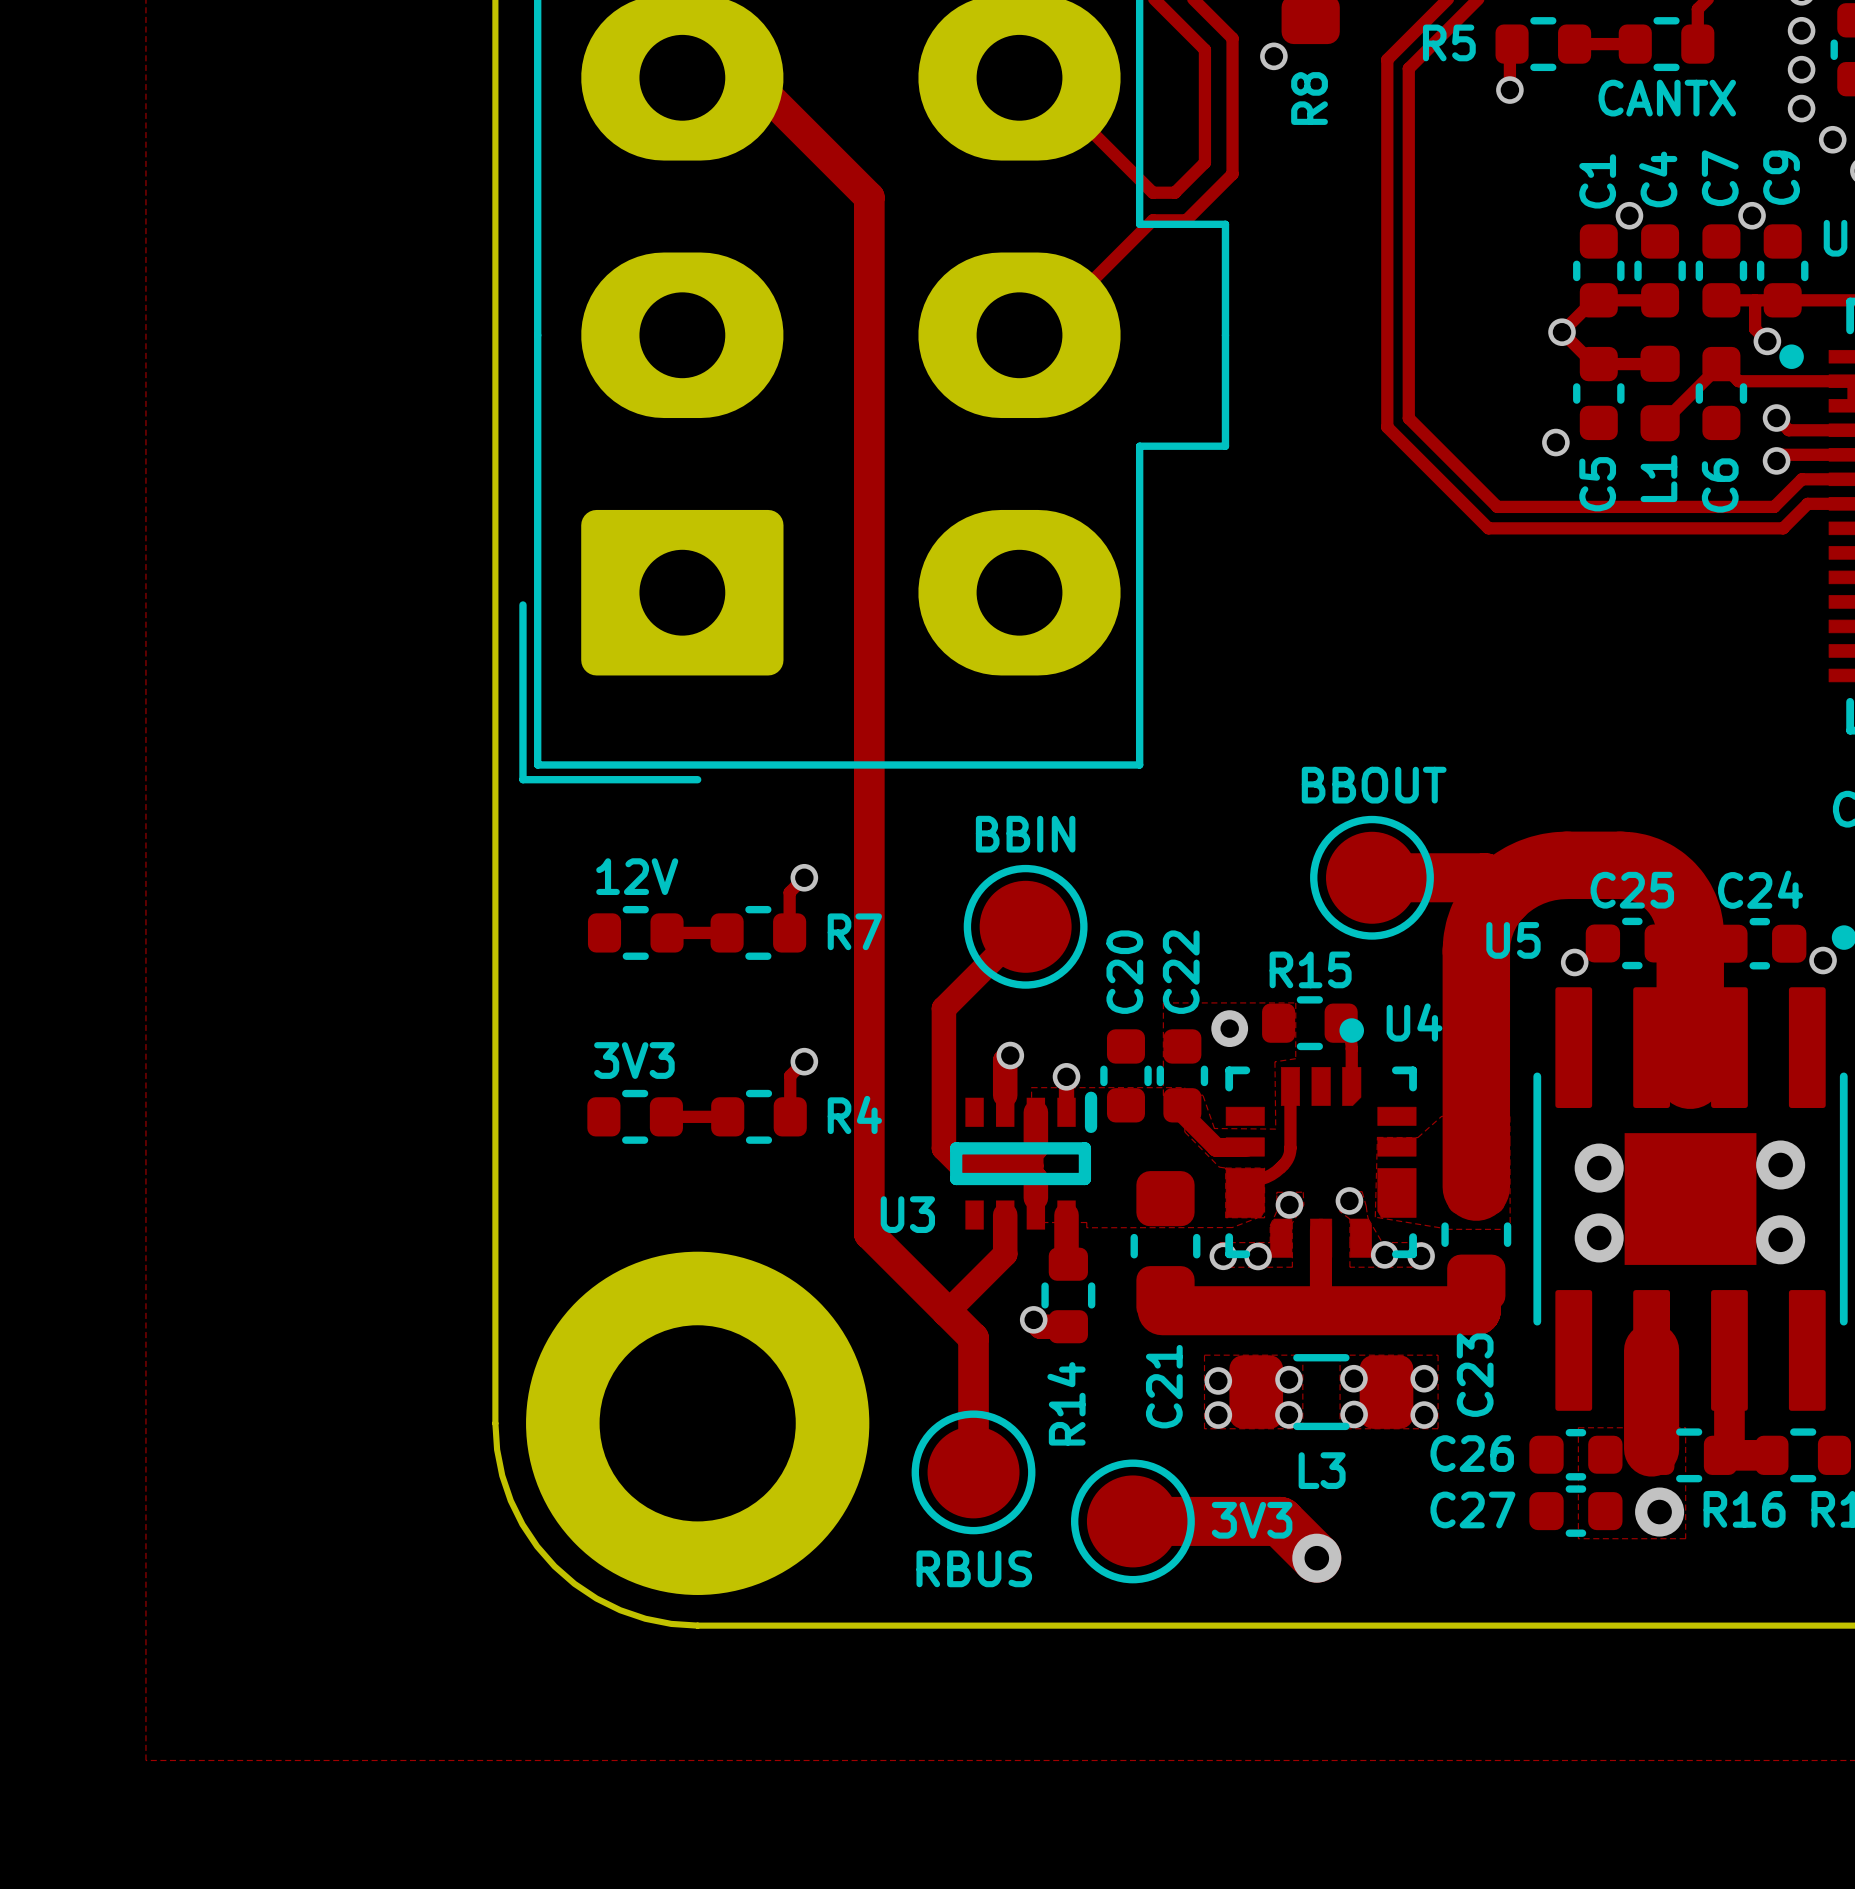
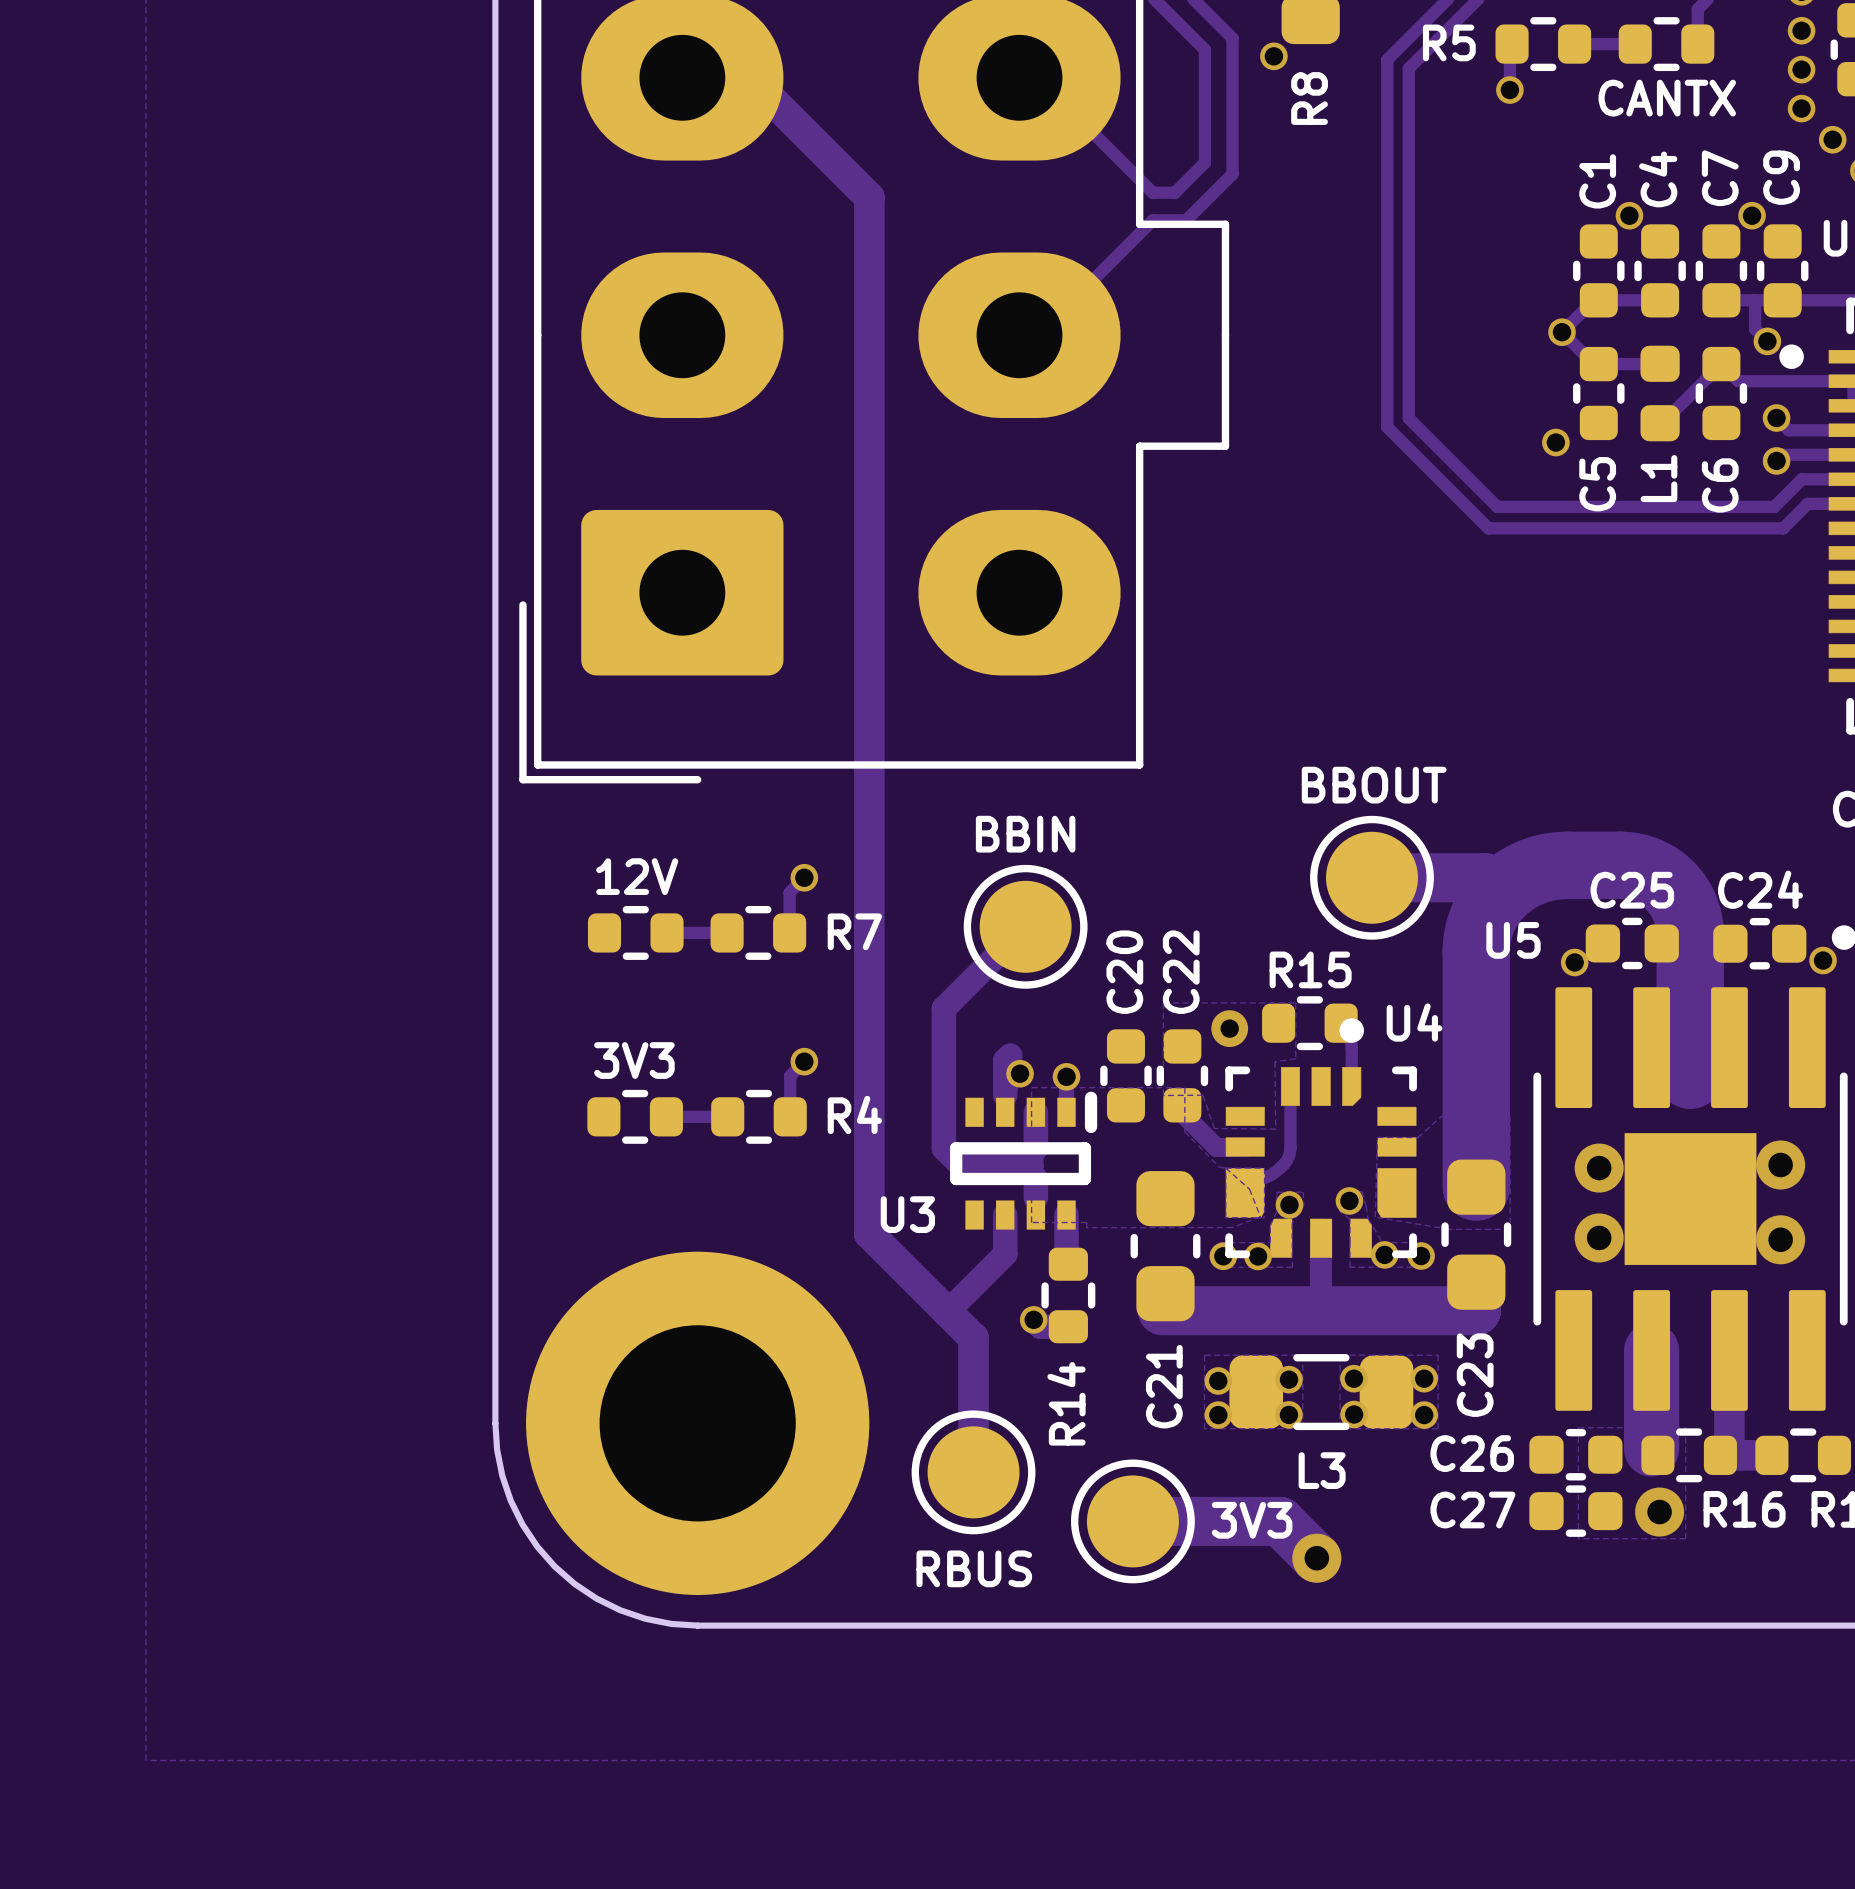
via position: (1010, 1055) -> (1020, 1073)

